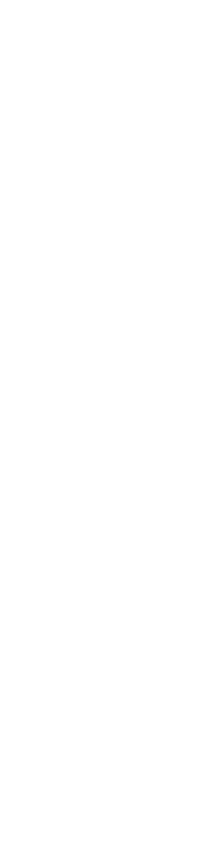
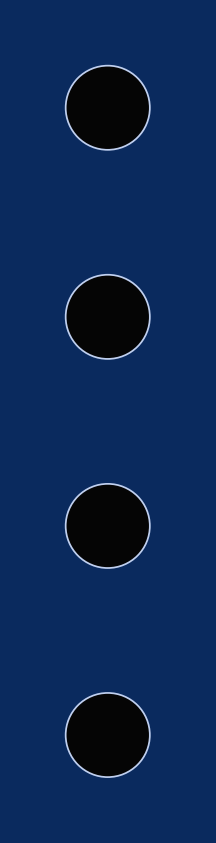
part: none -> (107, 107)
part: none -> (107, 316)
part: none -> (107, 525)
part: none -> (107, 735)

